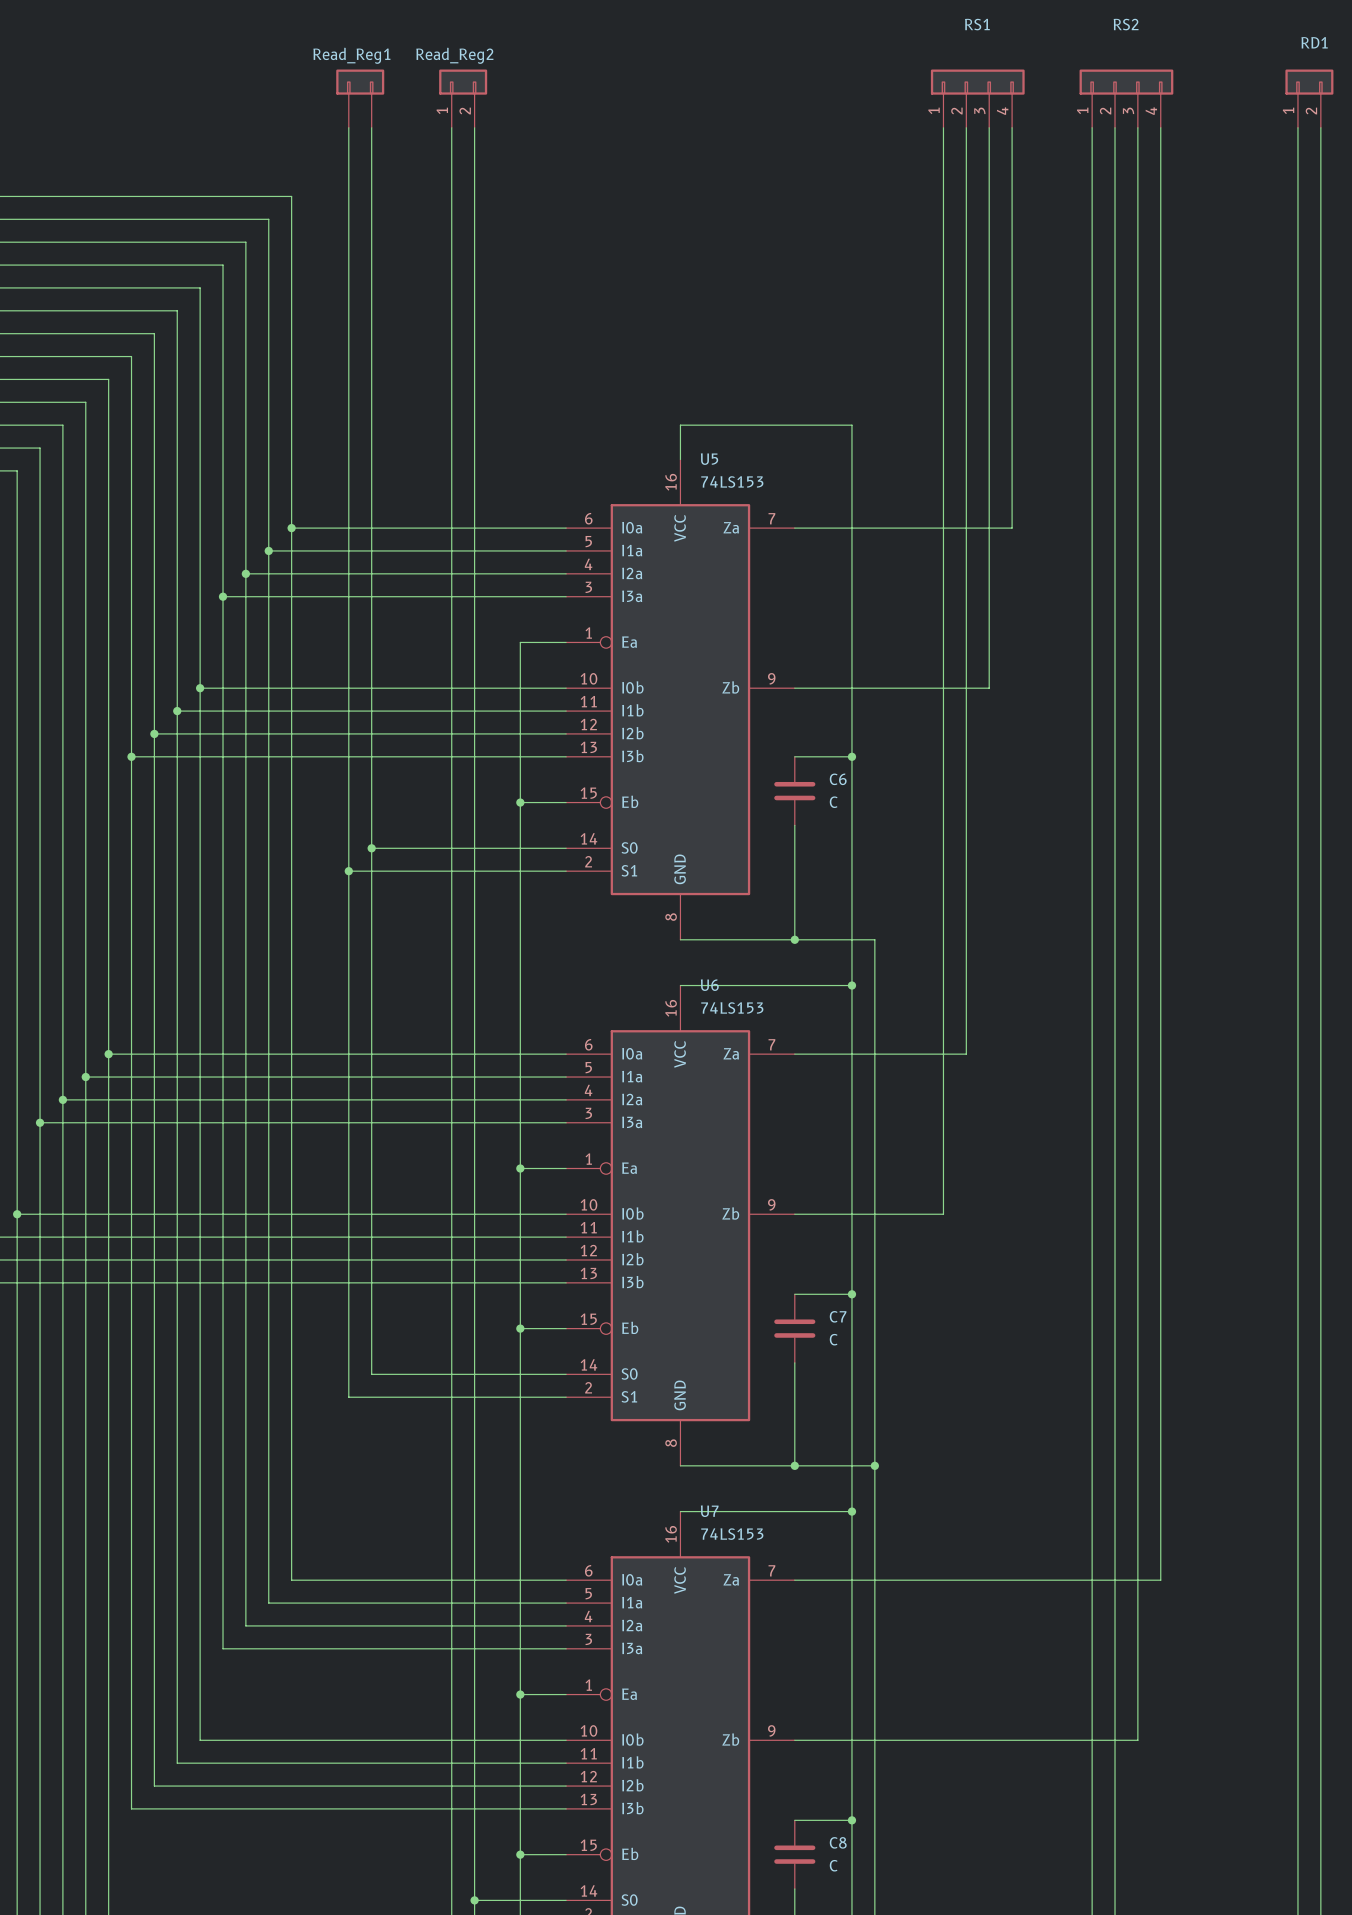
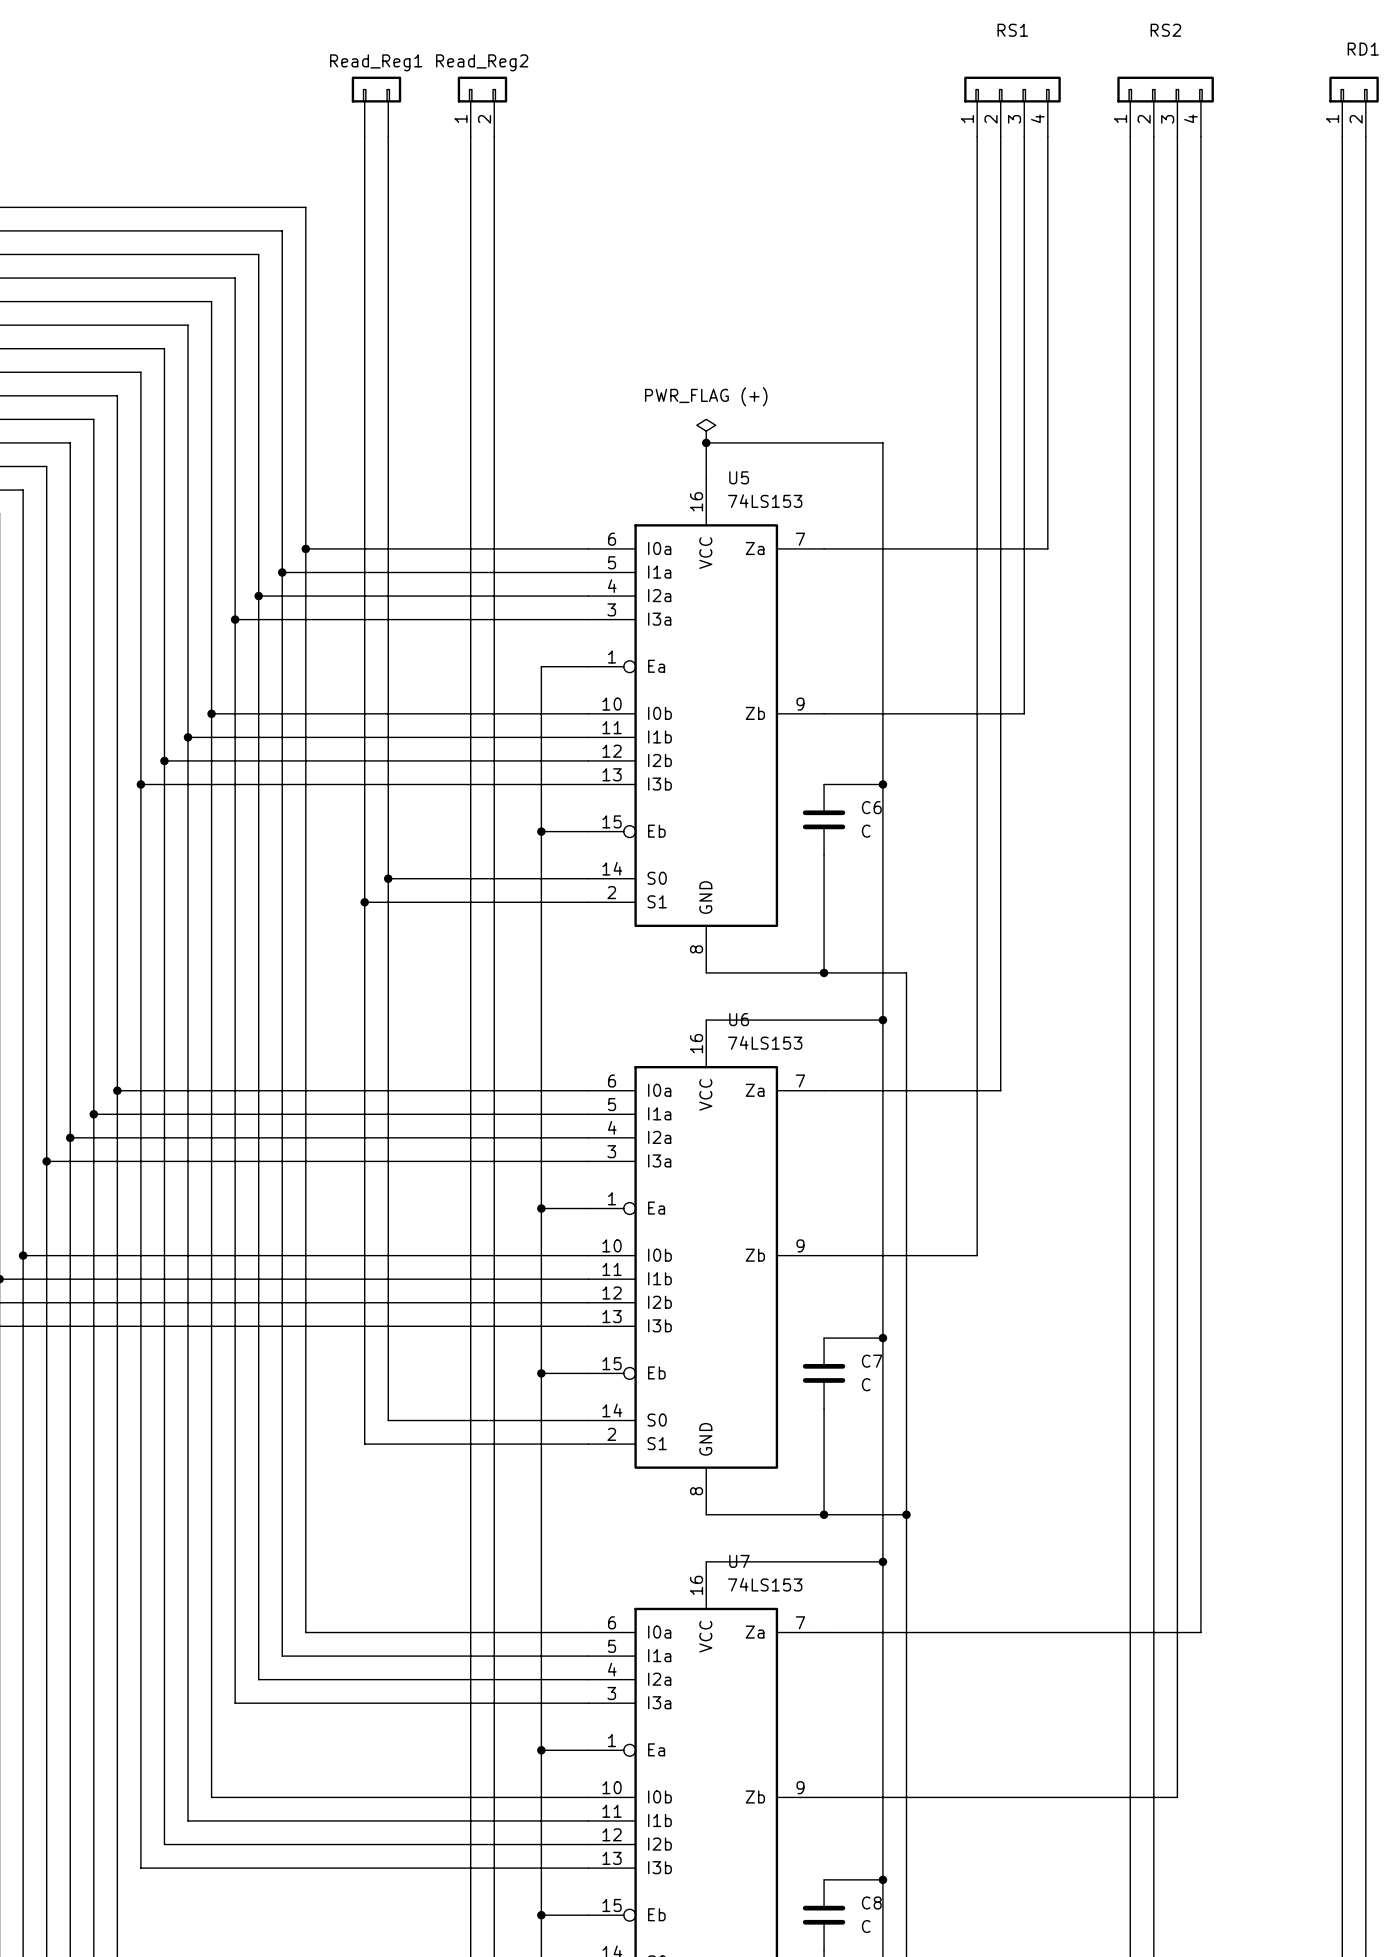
power symbol: none -> PWR_FLAG (+) (706, 431)
junction: none -> (706, 442)

